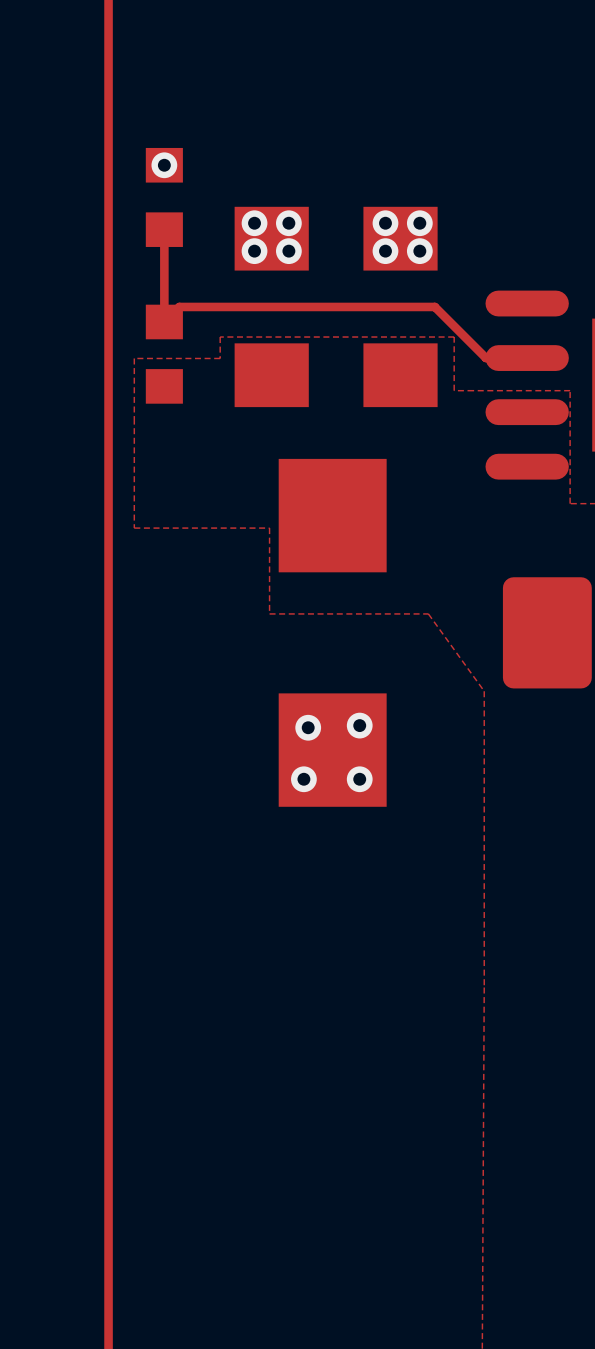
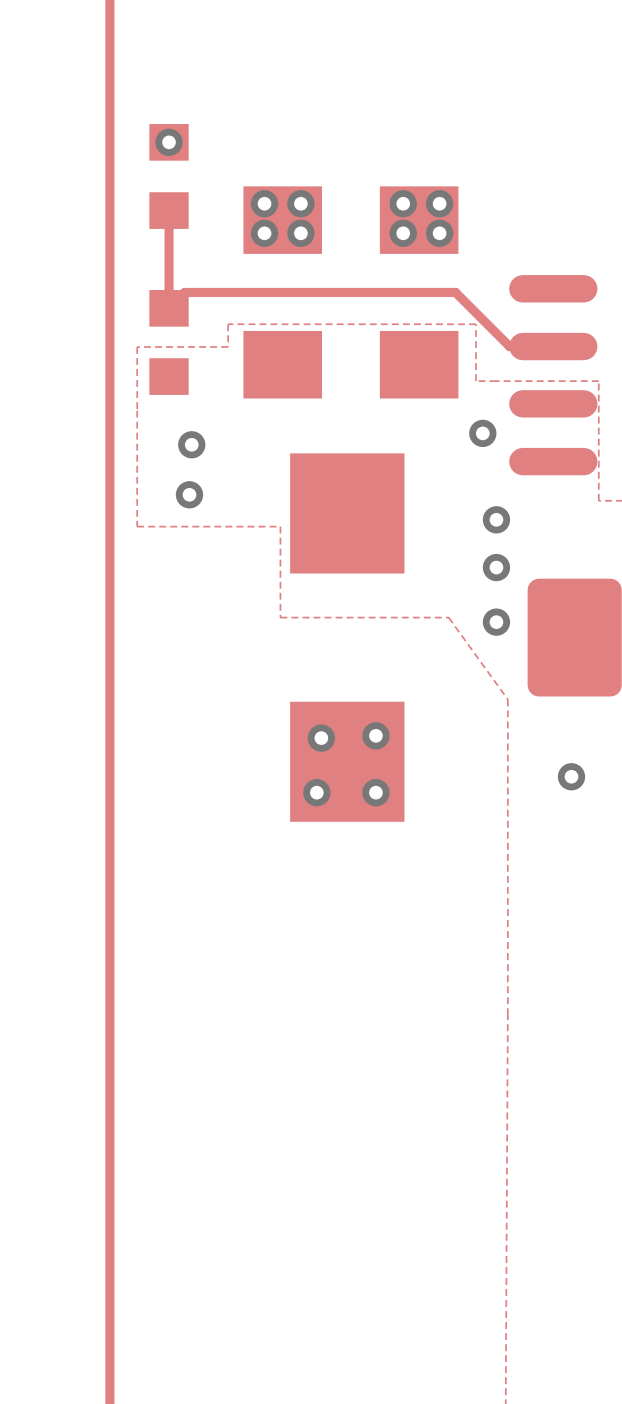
via: none -> (482, 433)
via: none -> (191, 444)
via: none -> (189, 494)
via: none -> (496, 519)
via: none -> (496, 567)
via: none -> (496, 622)
via: none -> (571, 776)

